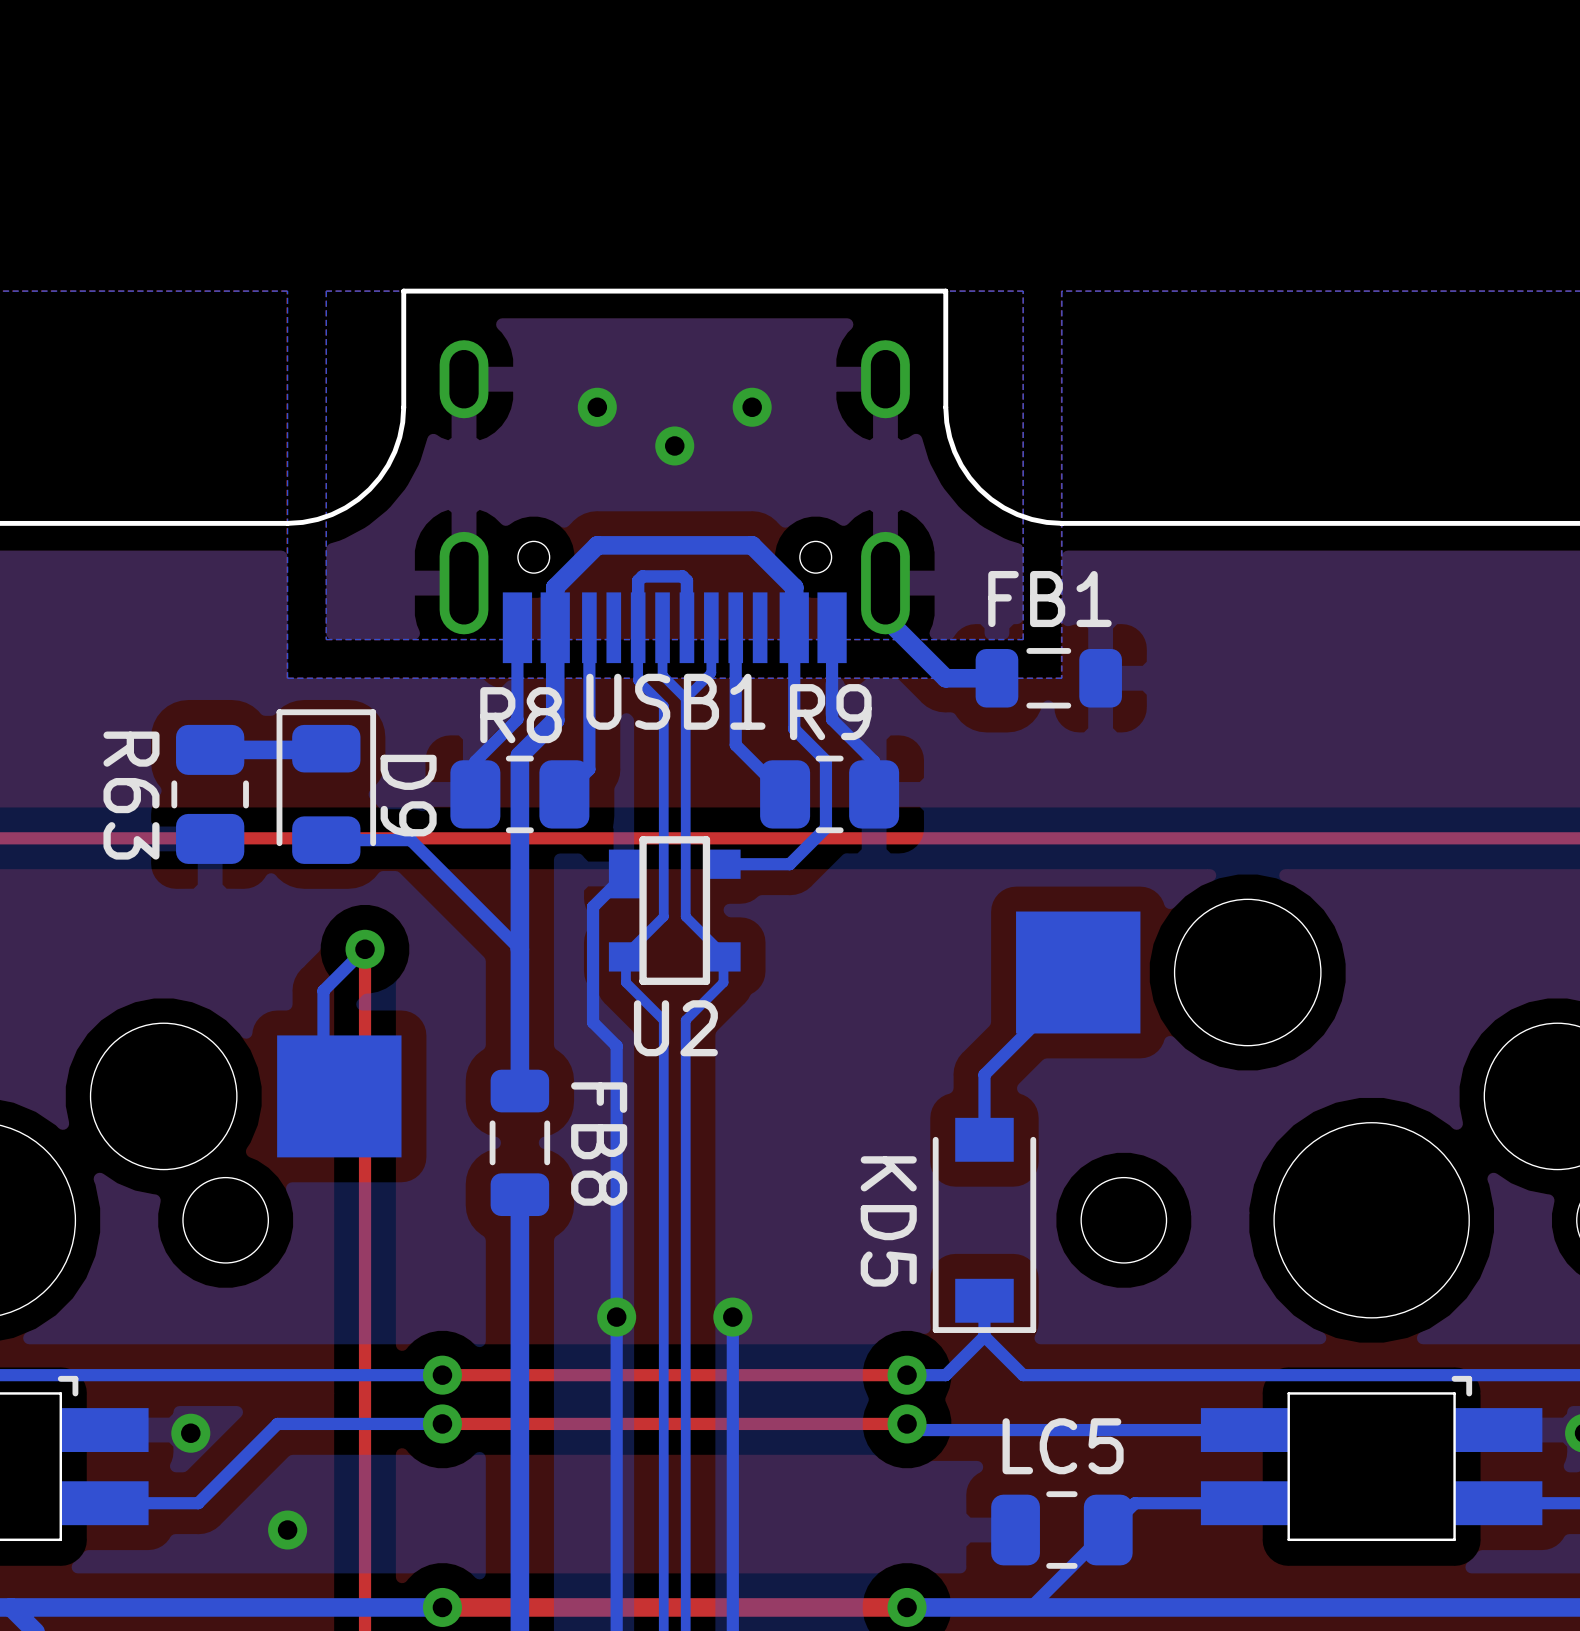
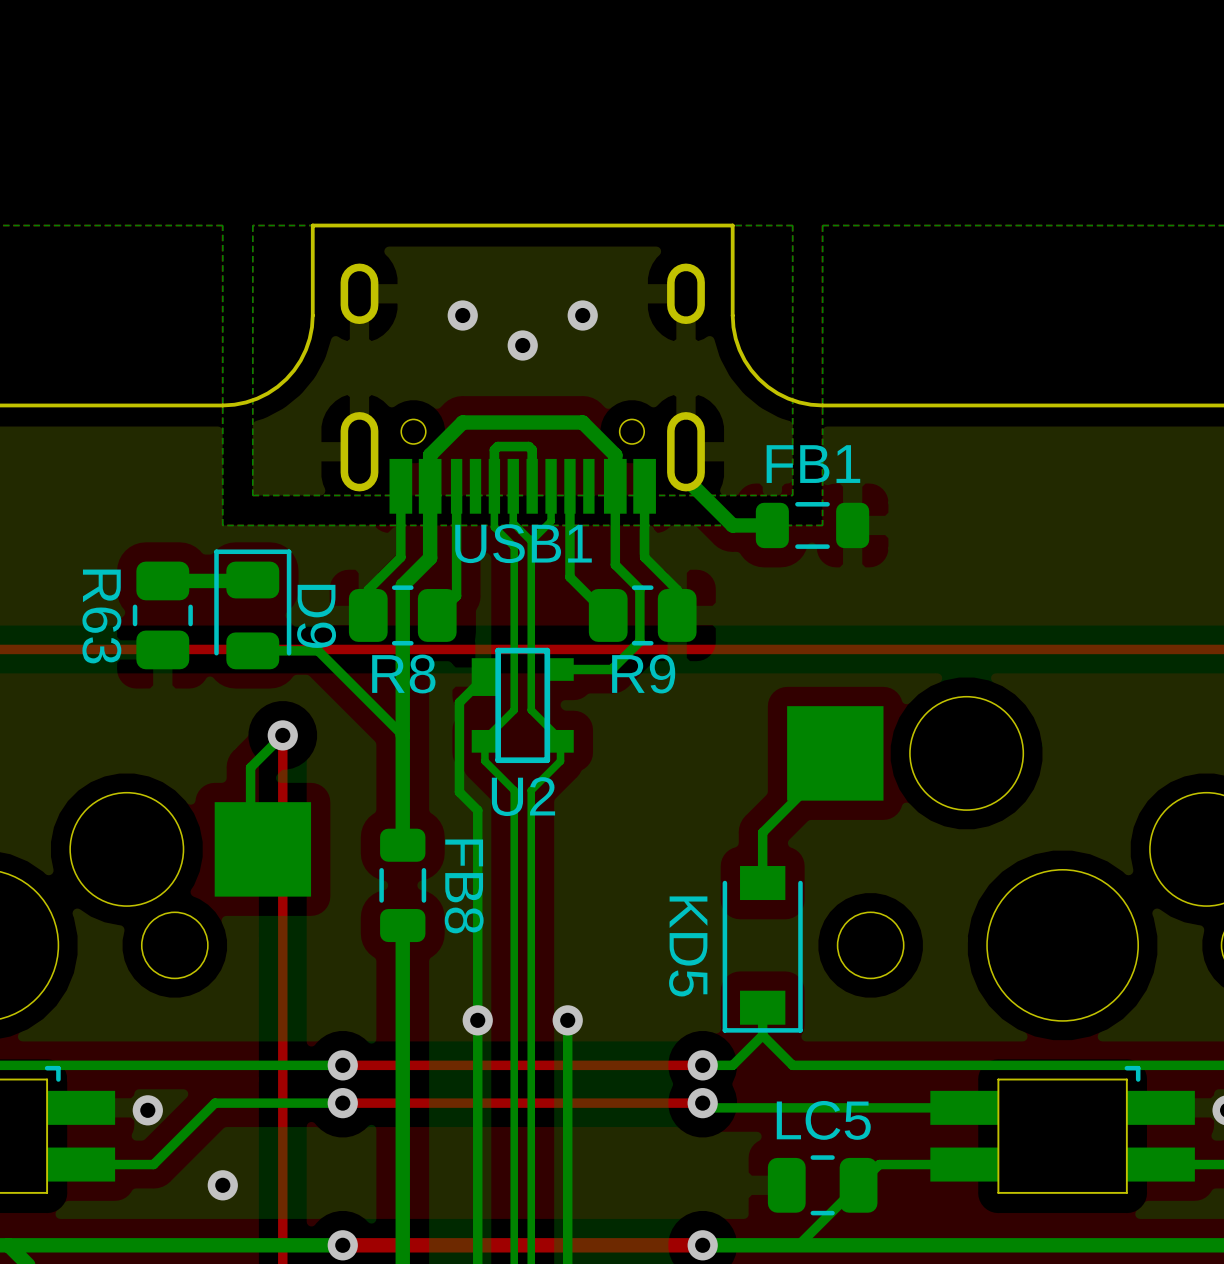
R9 name position: R9 (830, 712) -> R9 (643, 674)
R8 name position: R8 (521, 715) -> R8 (403, 674)

